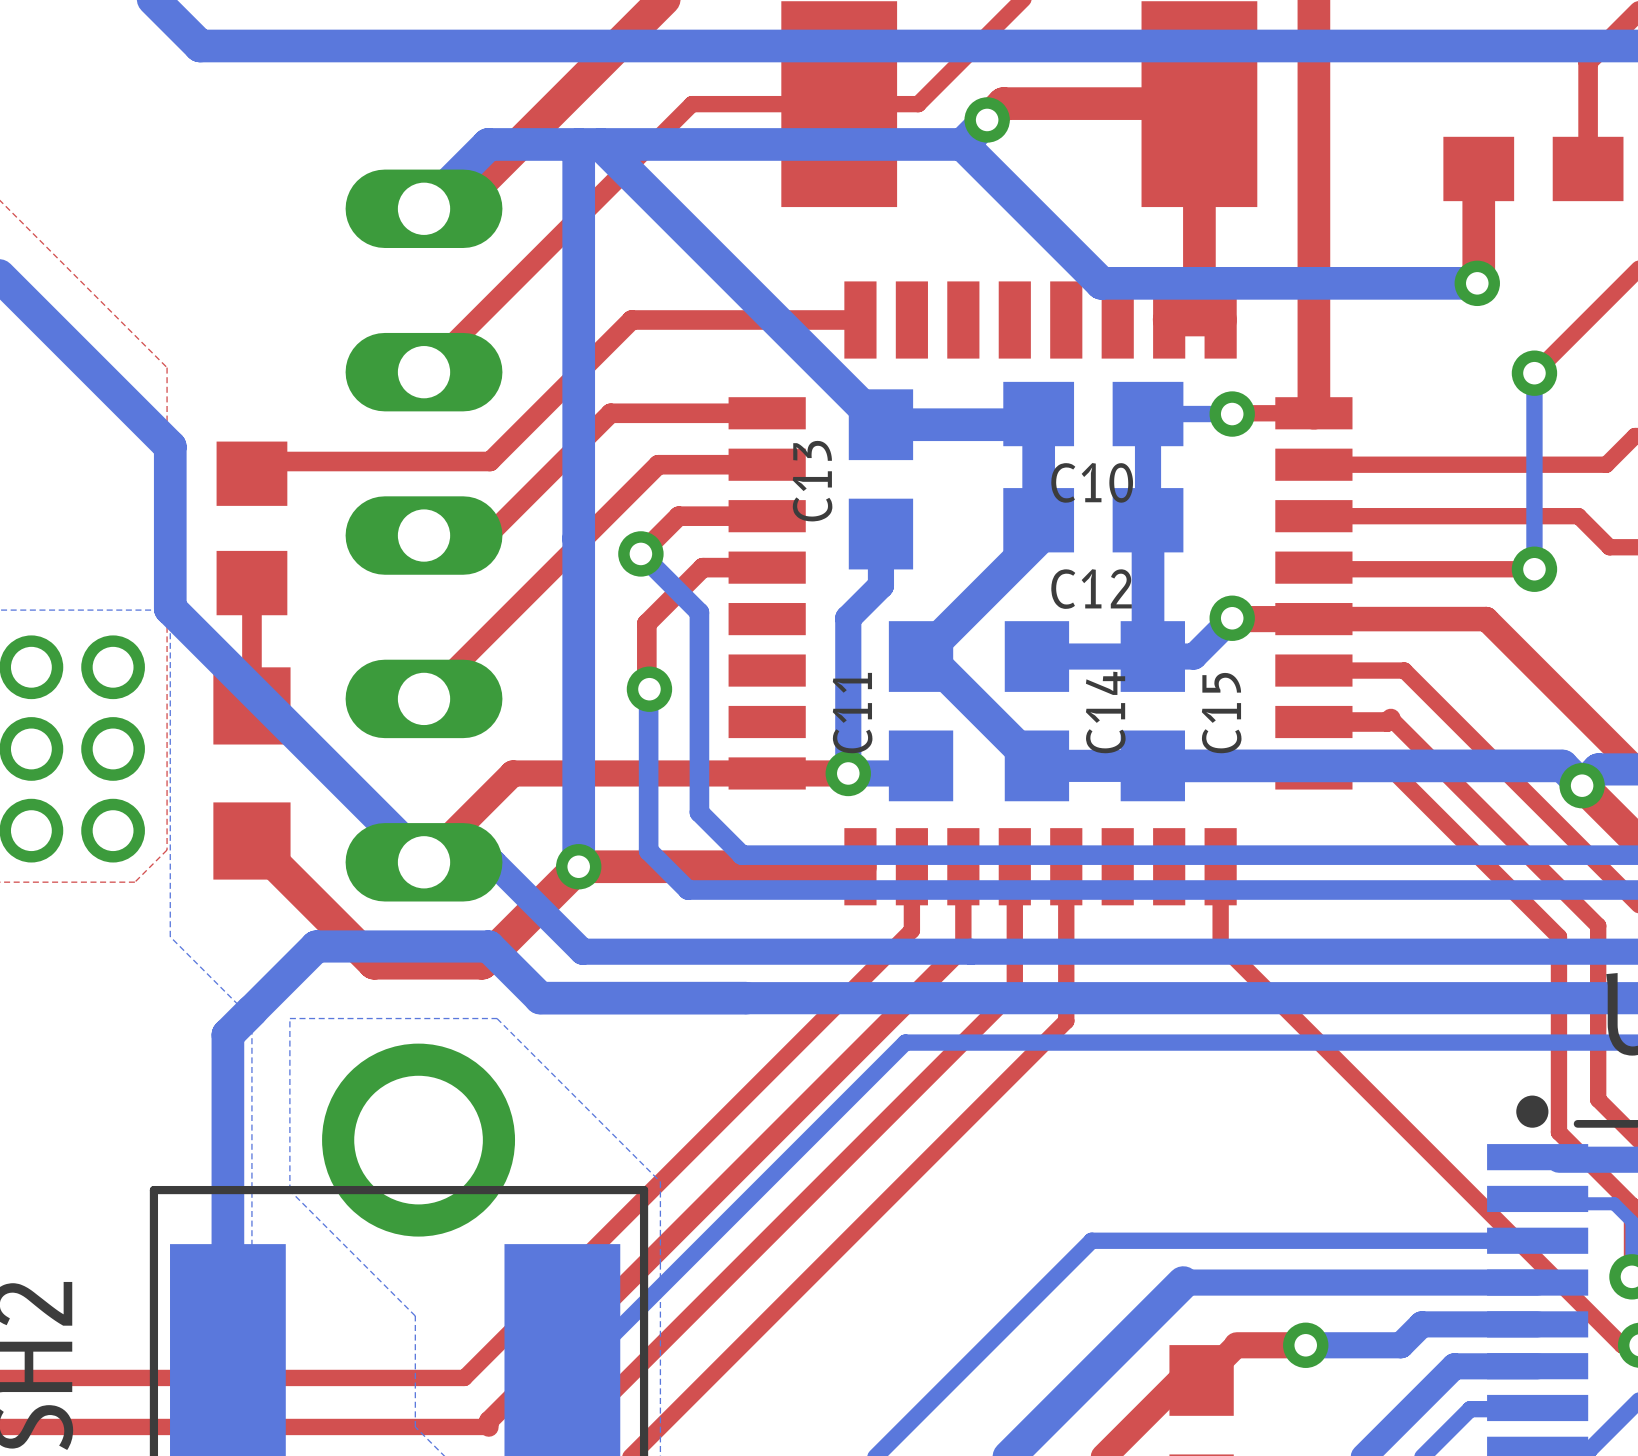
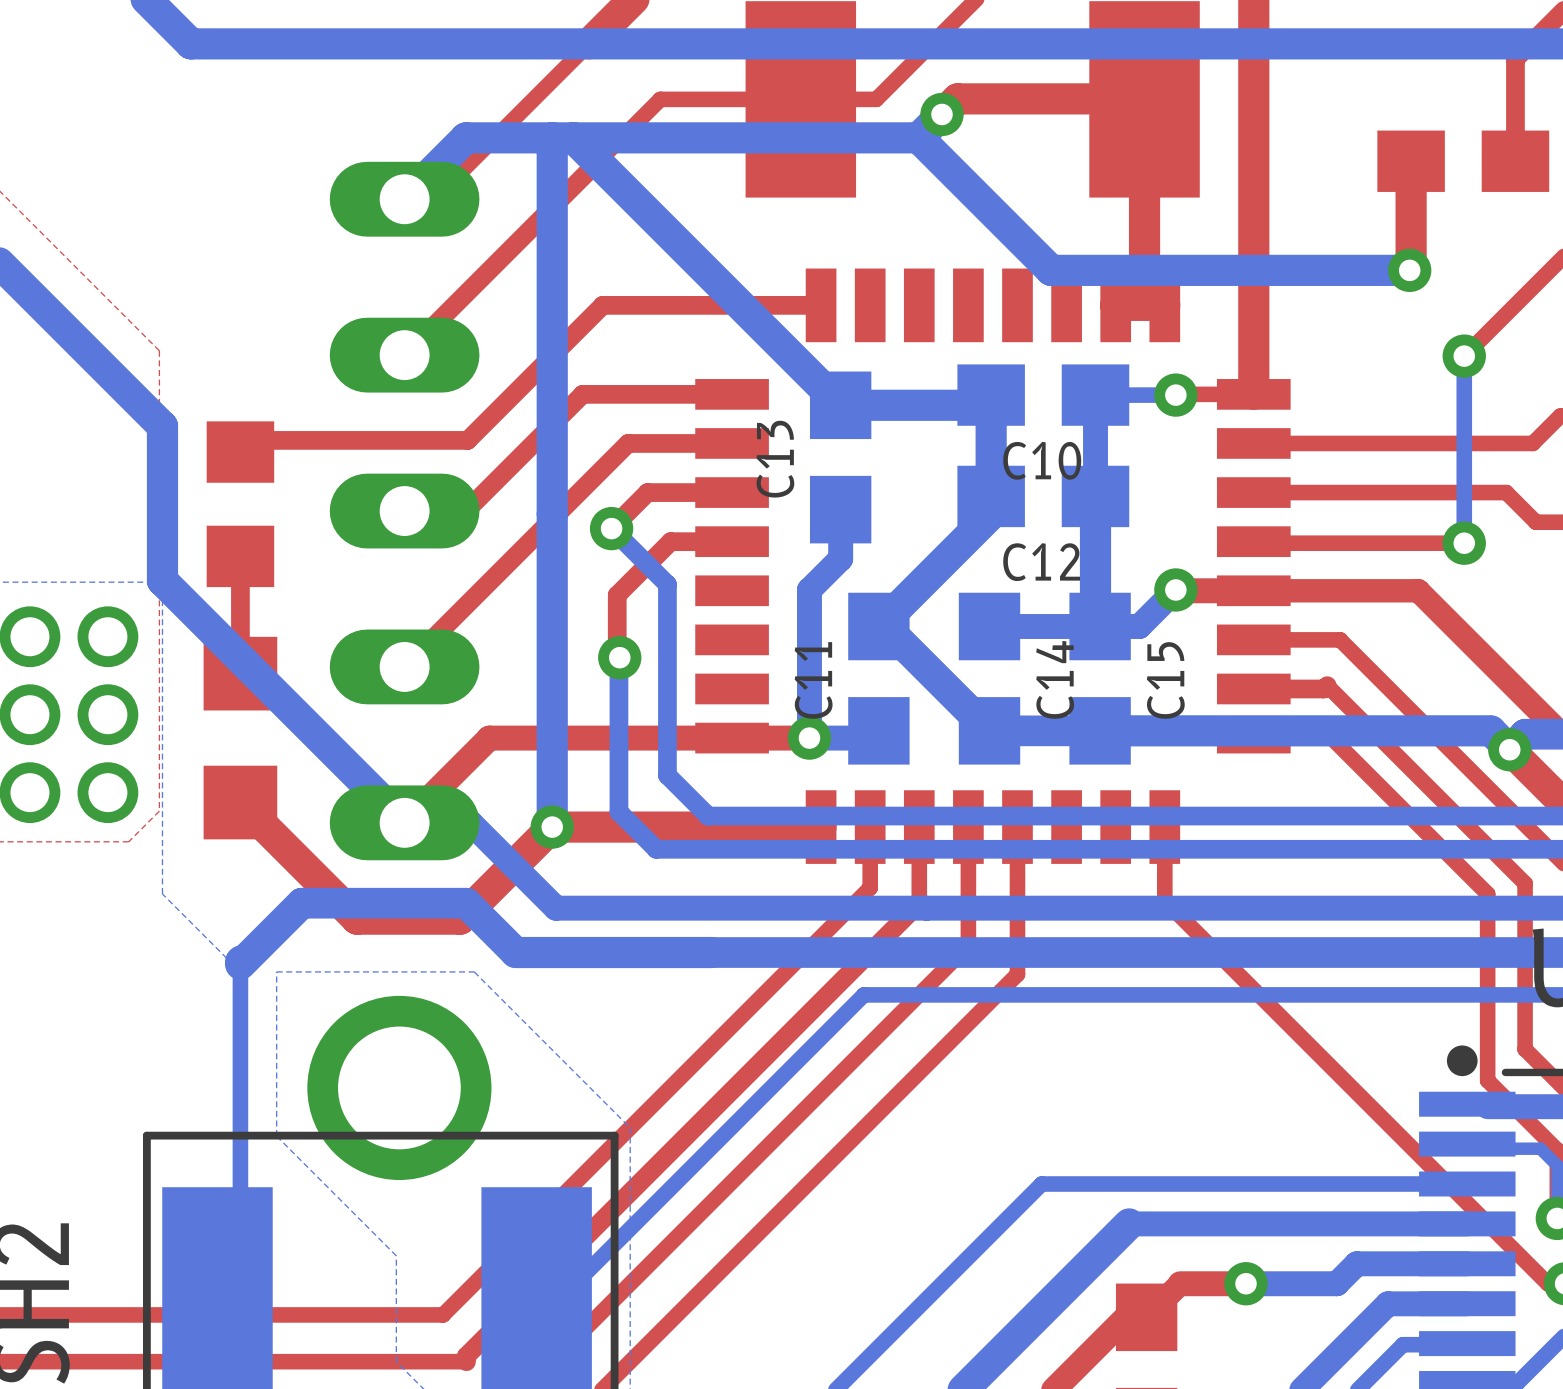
top track width: thick (617, 45) (454, 208) -> thin (589, 43) (433, 199)
bottom track: none -> (240, 961) (240, 1205)
bottom track: (251, 1010) (227, 1034) (227, 1353) -> none

